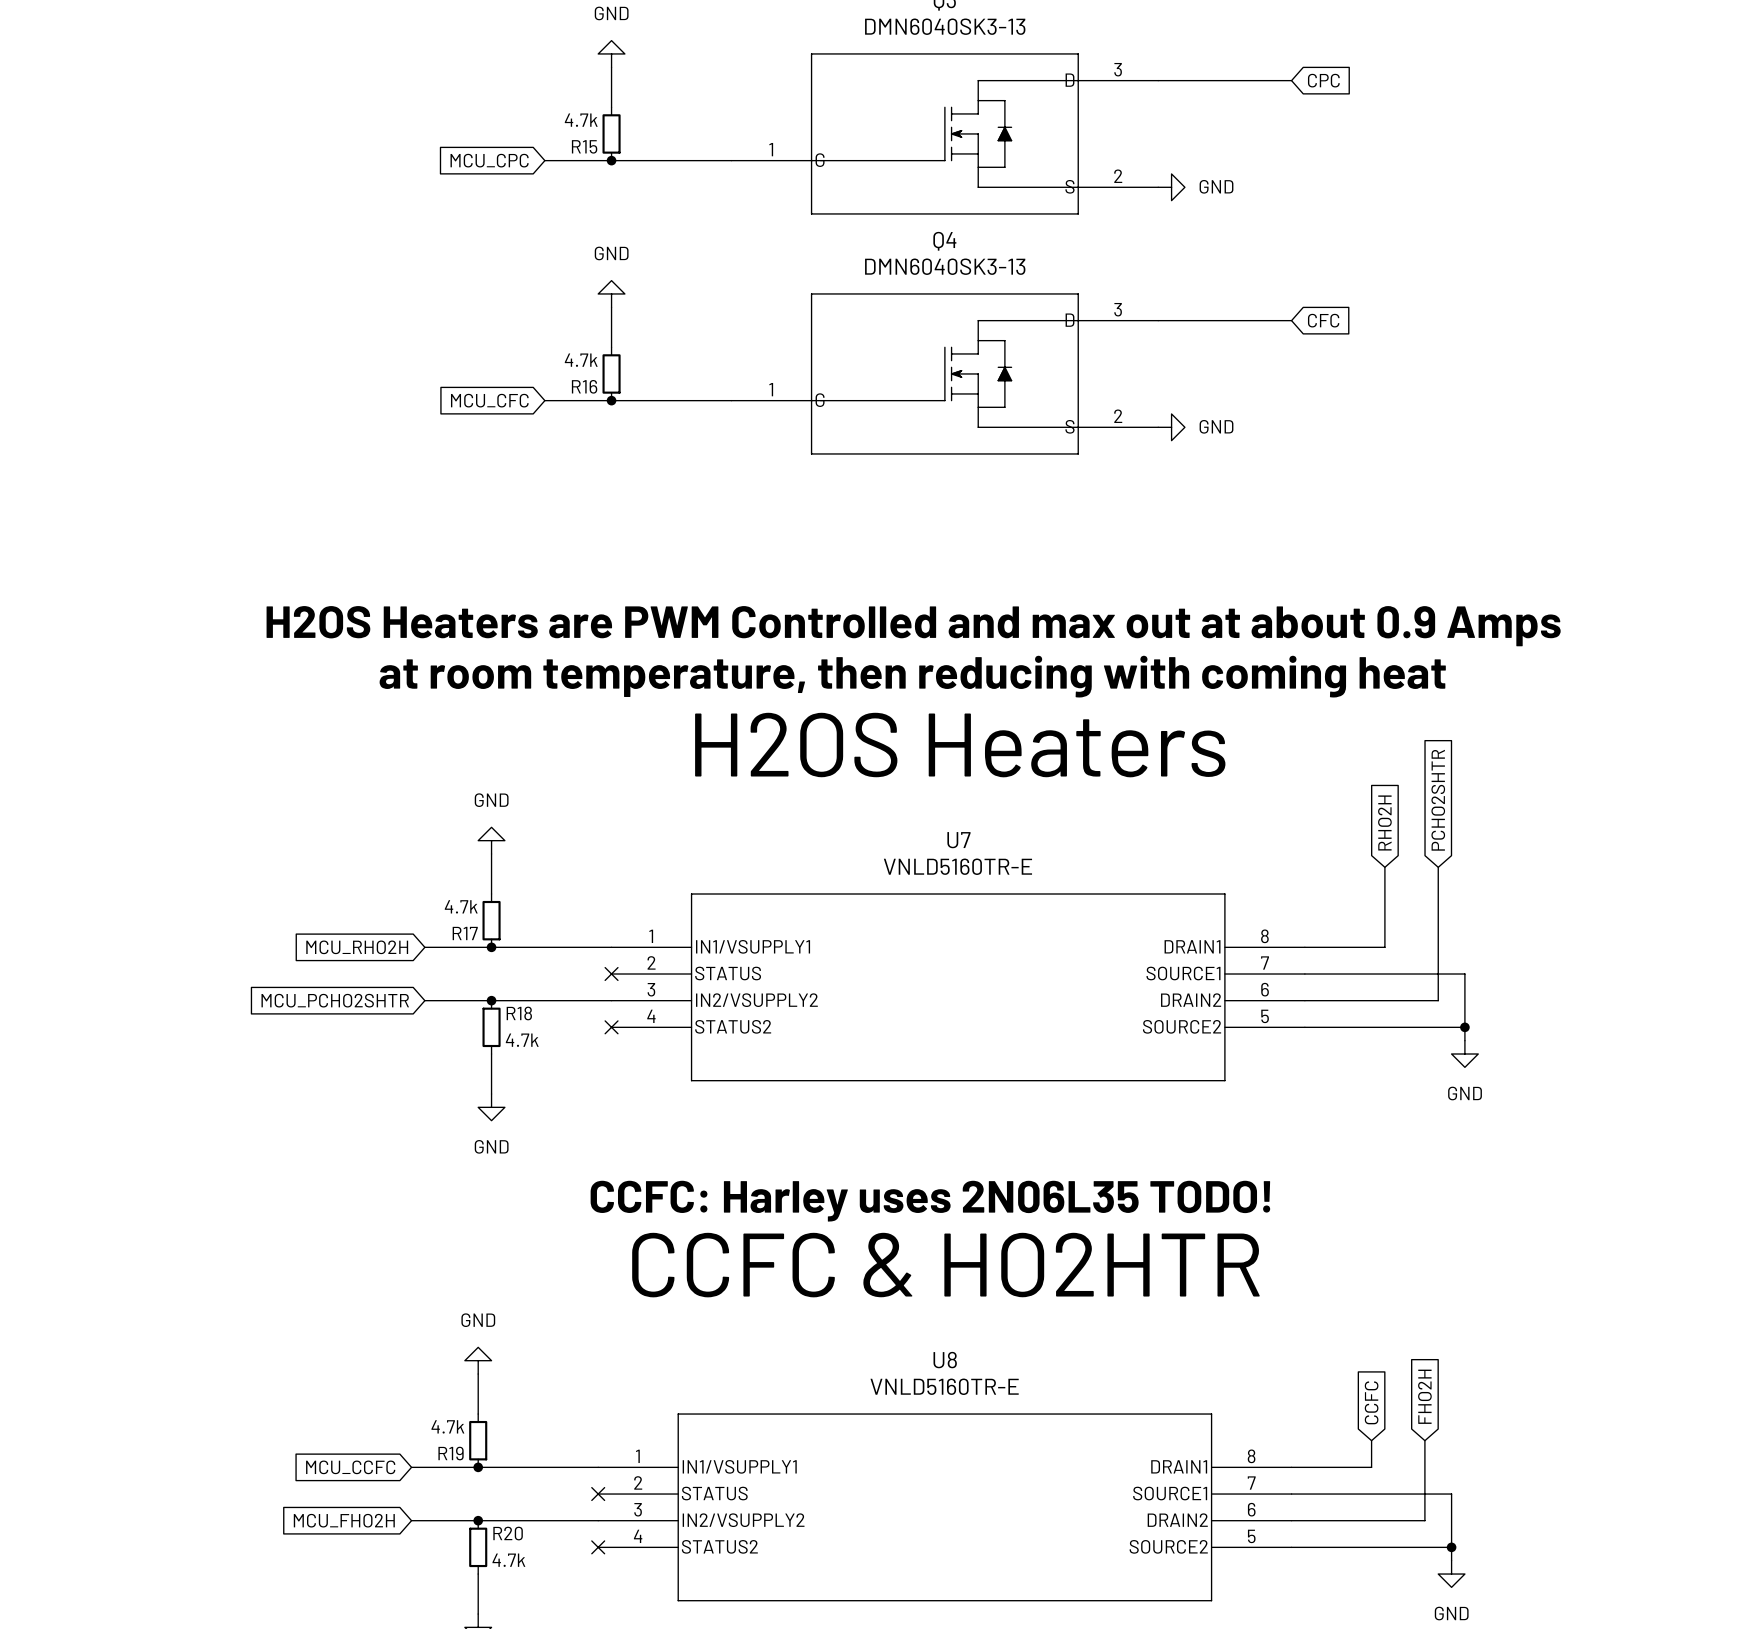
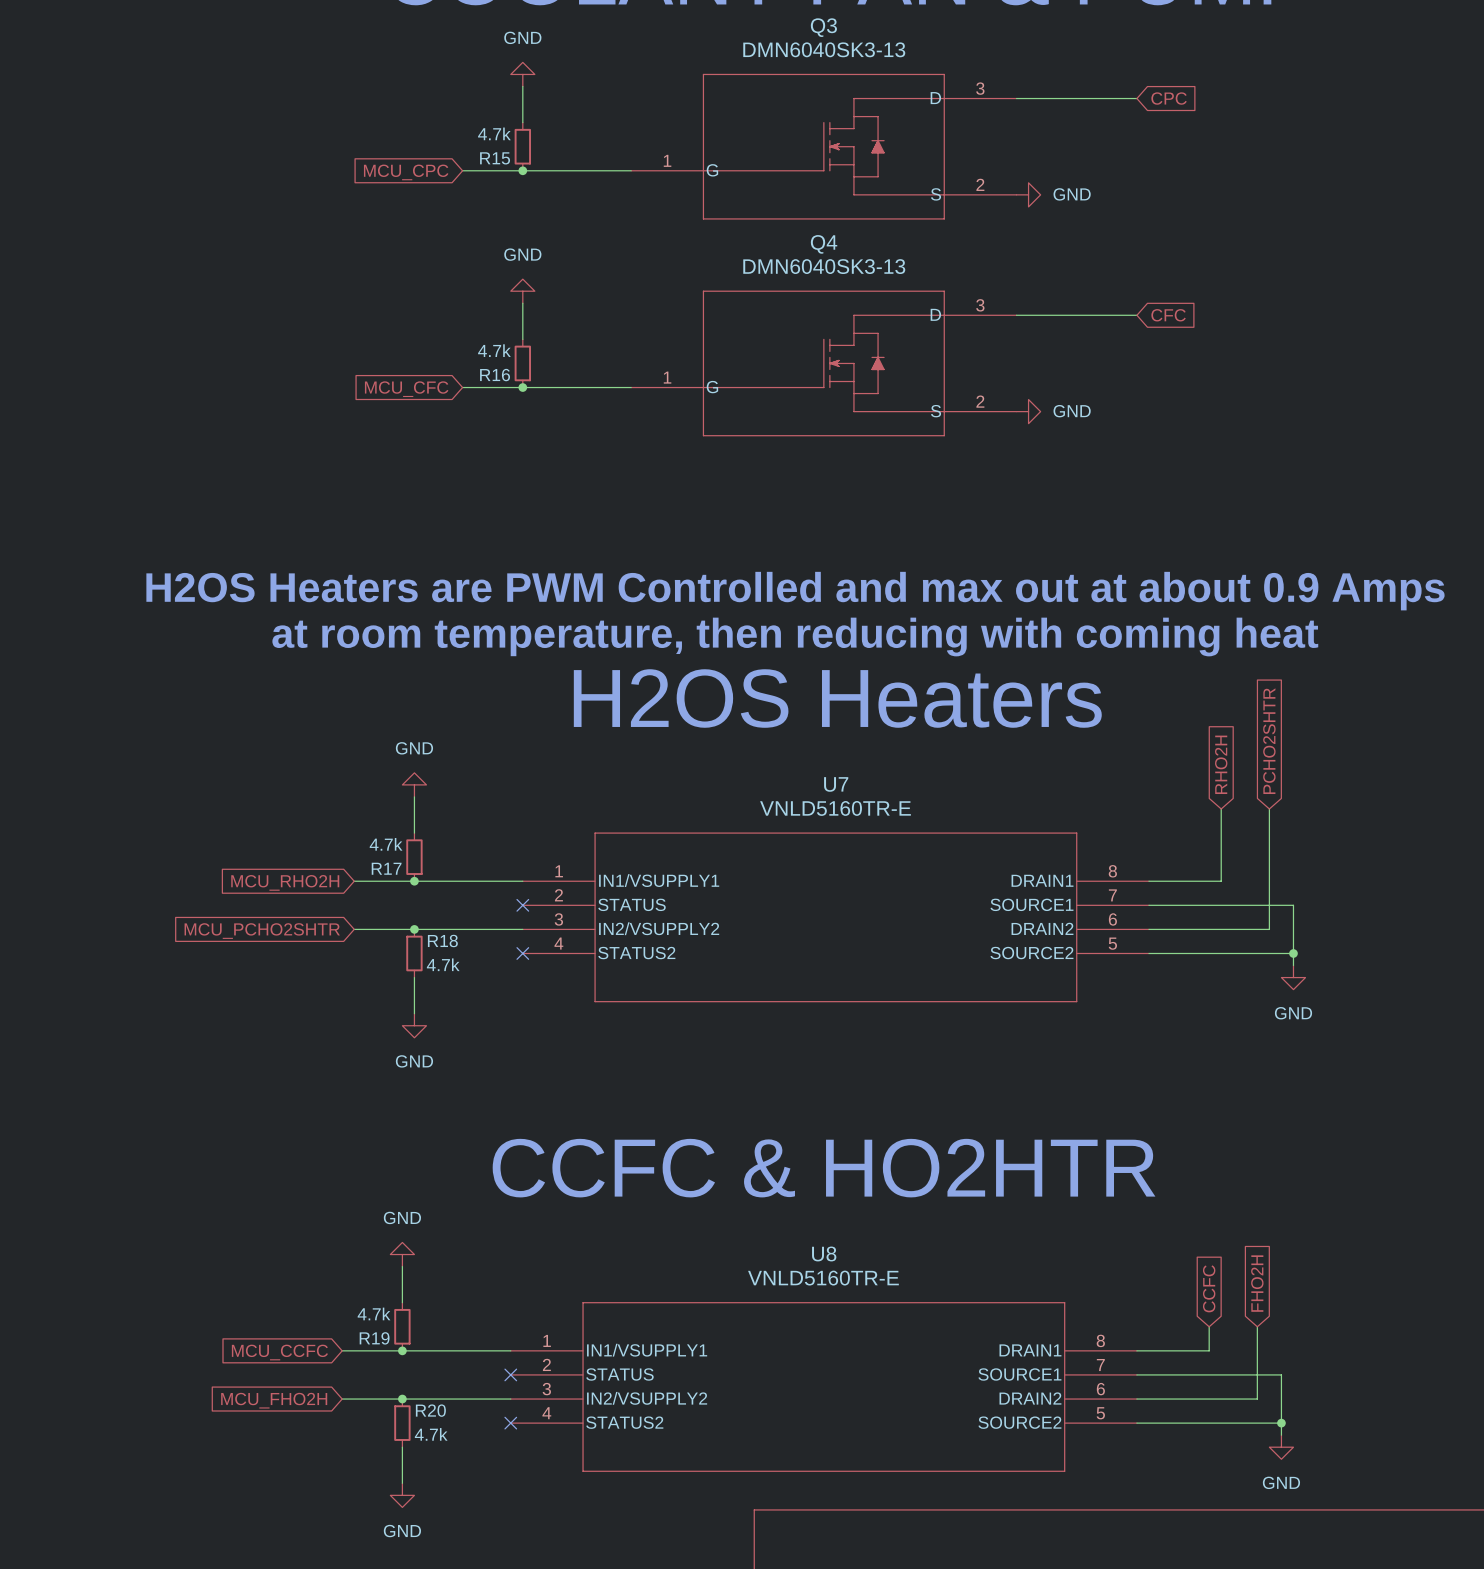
text: CCFC: Harley uses 2N06L35 TODO! (930, 1201) -> none

